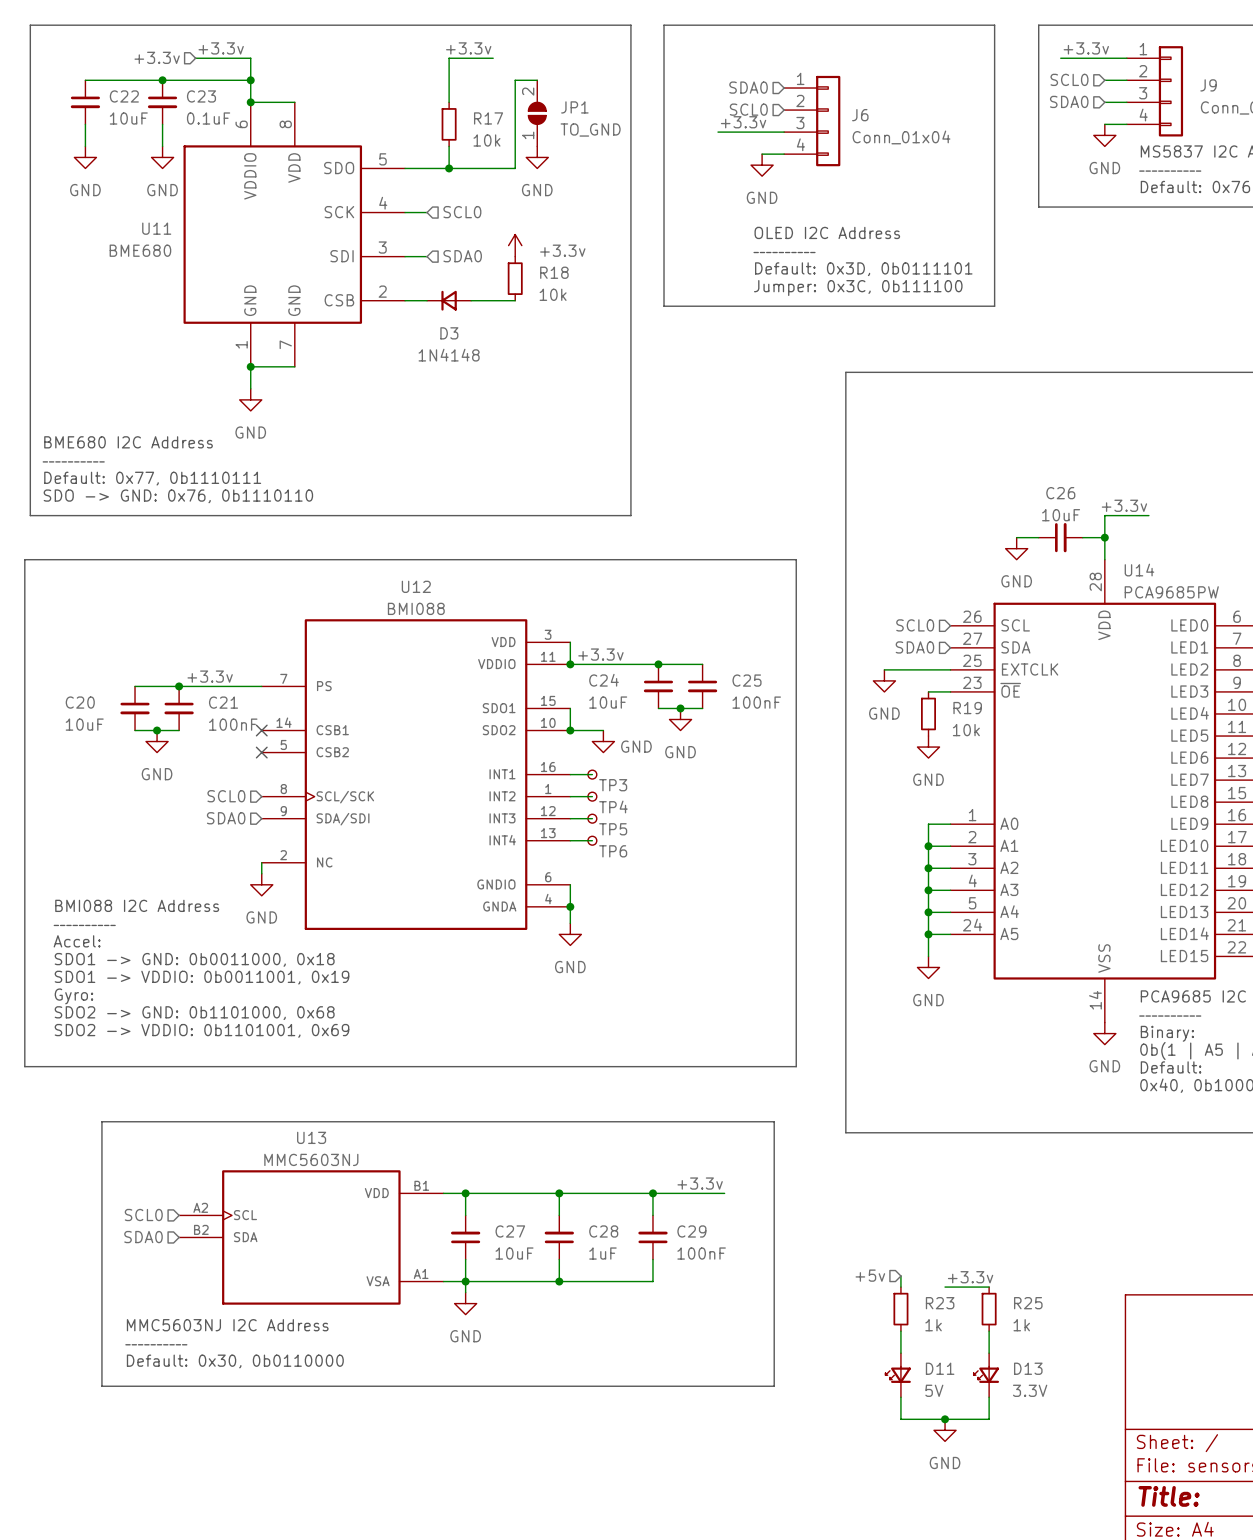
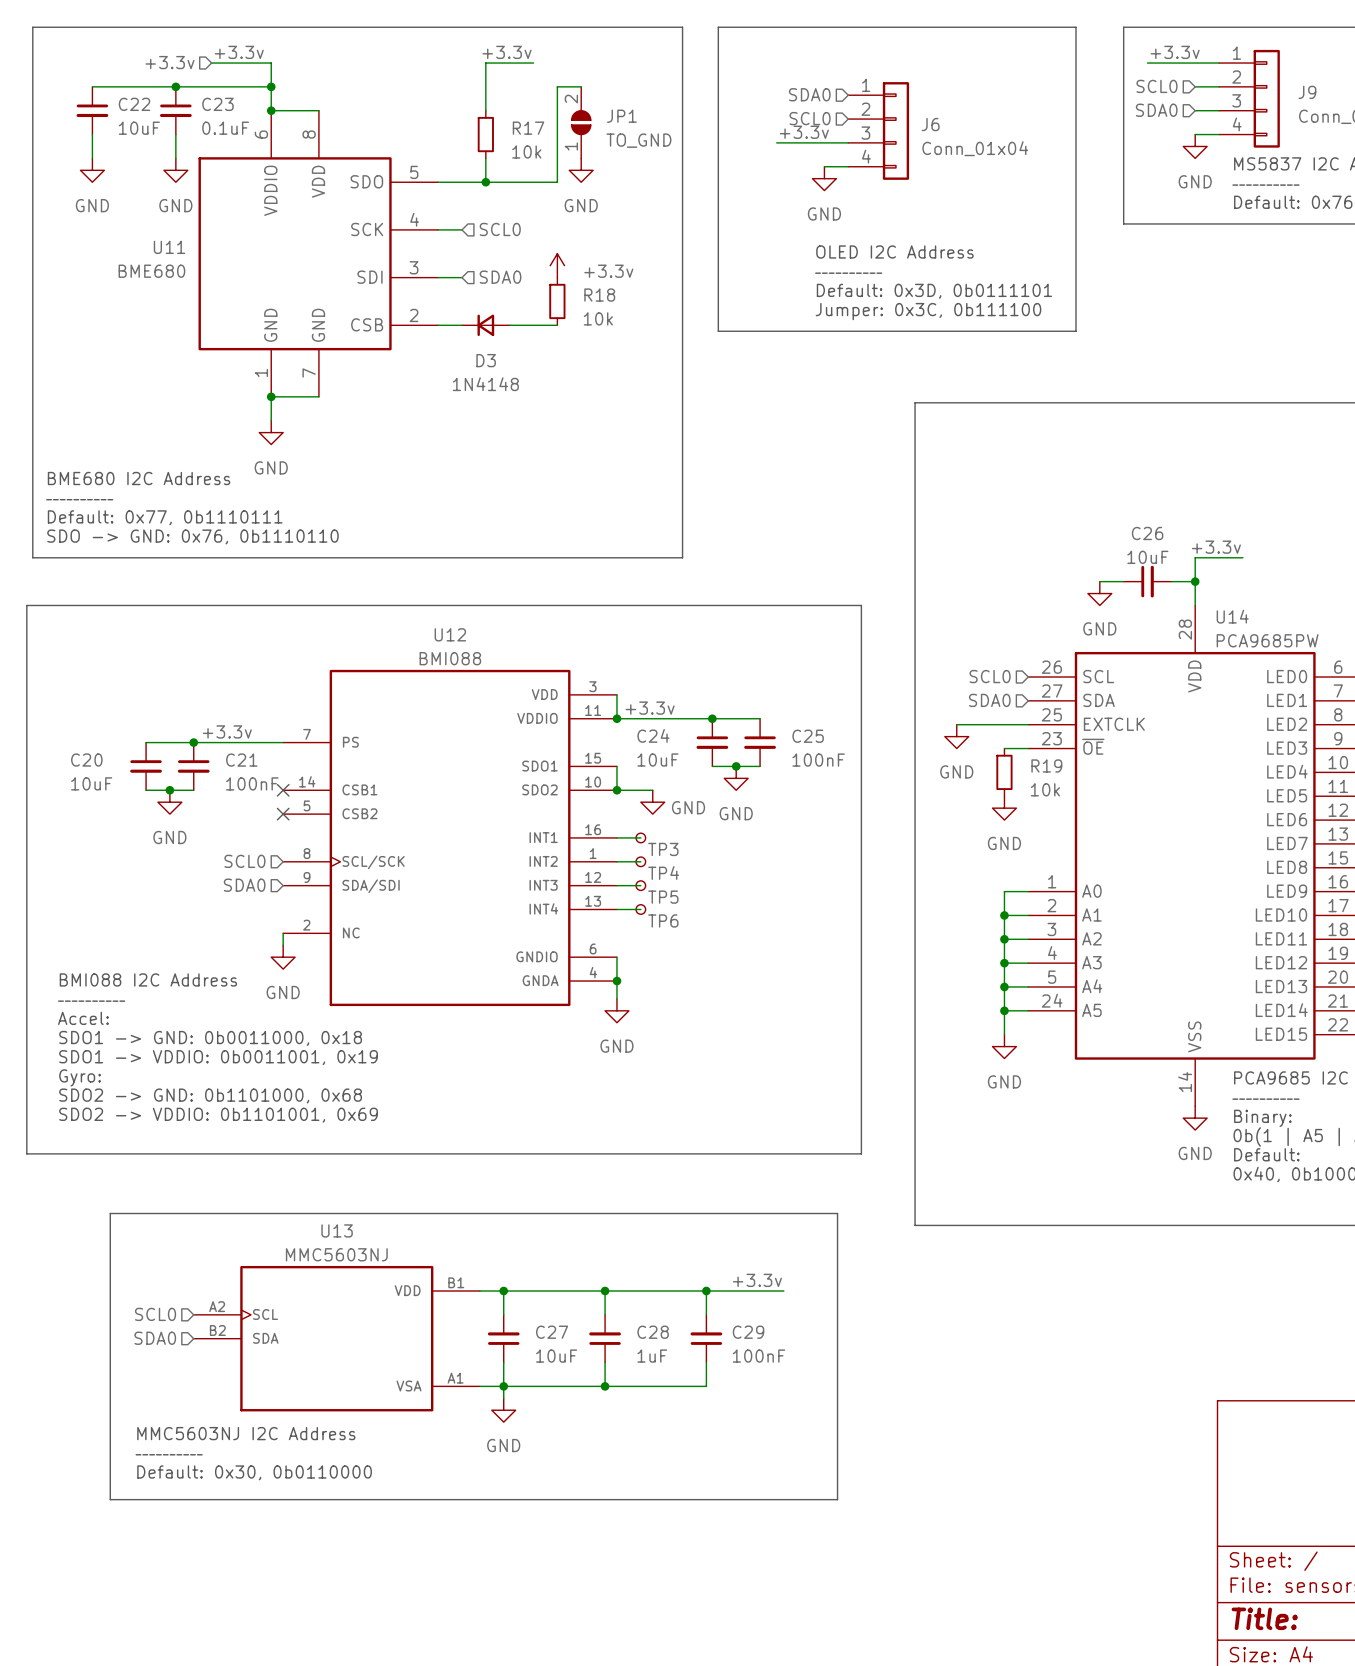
hierarchical label: +5v (870, 1275) -> none
wire: (900, 1276) (900, 1287) -> none
label: +3.3v (970, 1277) -> none
wire: (945, 1287) (989, 1287) -> none
R23: 1k (900, 1309) -> none
R25: 1k (989, 1309) -> none
wire: (900, 1331) (900, 1353) -> none
wire: (989, 1331) (989, 1353) -> none
D11: 5V (898, 1375) -> none
D13: 3.3V (986, 1375) -> none
wire: (900, 1397) (900, 1419) (989, 1419) (989, 1397) -> none
junction: (945, 1419) -> none
power symbol: GND (945, 1430) -> none

